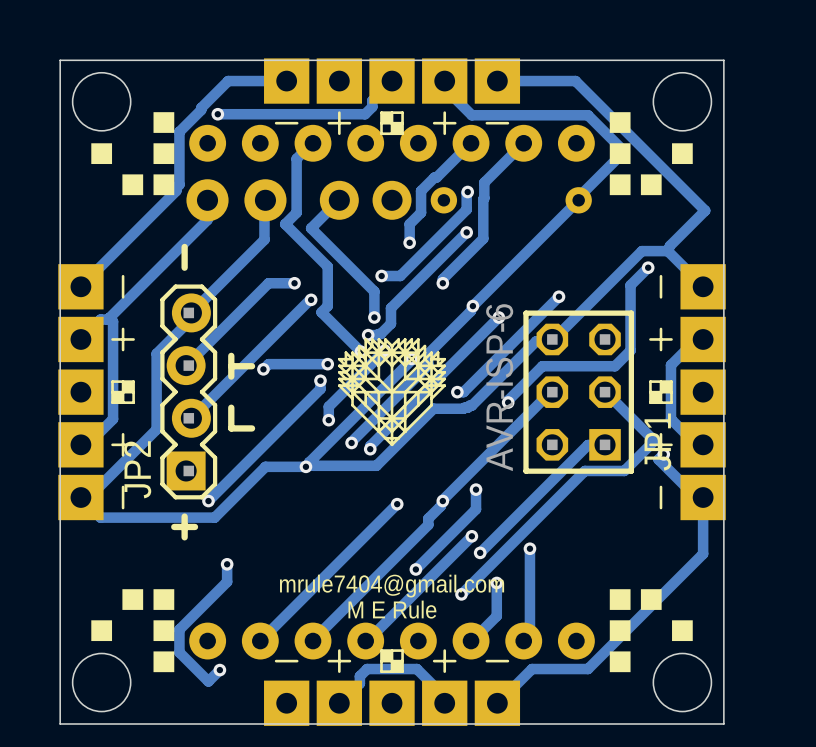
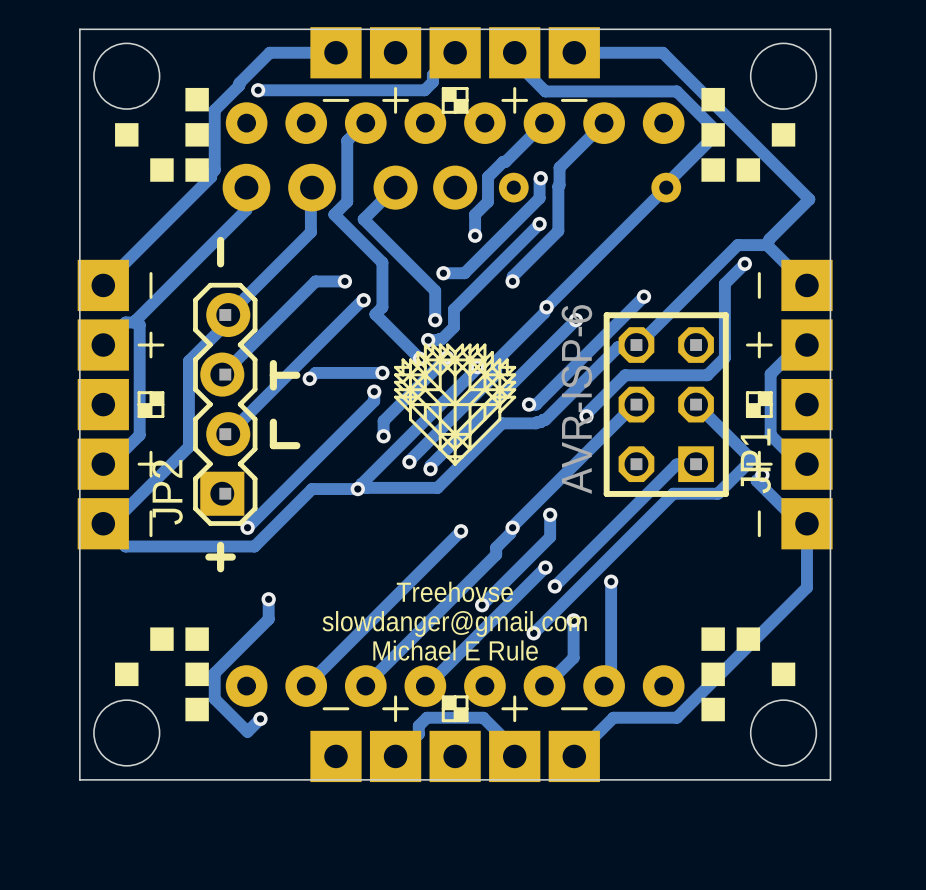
text: none -> Treehovse (454, 591)
text: mrule7404@gmail.com (392, 586) -> slowdanger@gmail.com (454, 623)
text: M E Rule (392, 609) -> Michael E Rule (455, 650)

